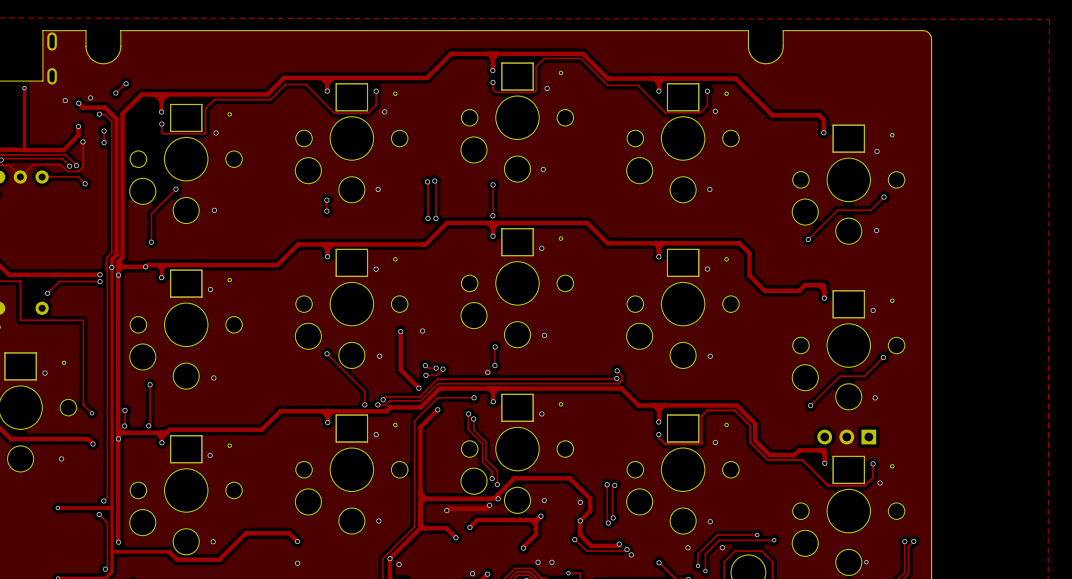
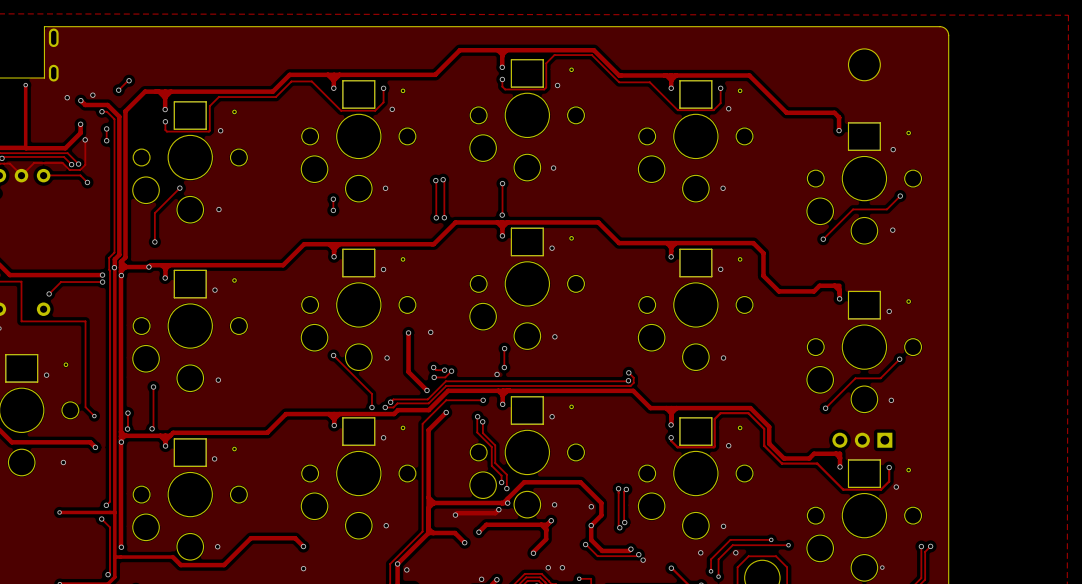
board edge: (86, 30) (86, 48) (88, 55) (94, 61) (103, 63) (112, 61) (118, 55) (120, 48) (120, 30) -> (88, 26) (123, 26)
board edge: (748, 30) (748, 48) (750, 55) (757, 61) (765, 63) (774, 61) (780, 55) (783, 48) (783, 30) -> (762, 26) (797, 26)
round board edge: none -> [848, 48, 881, 82]

